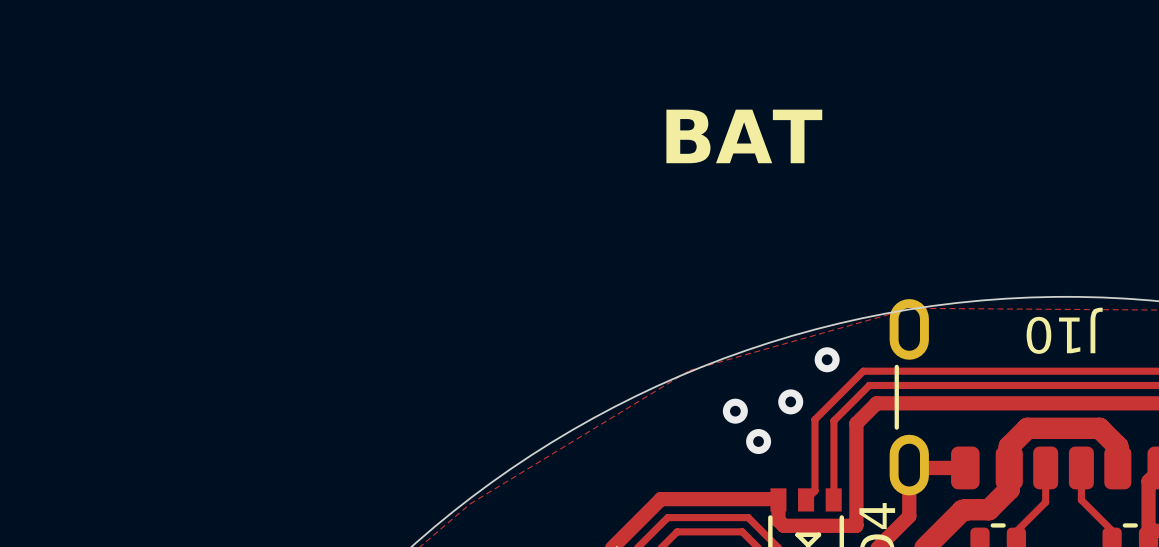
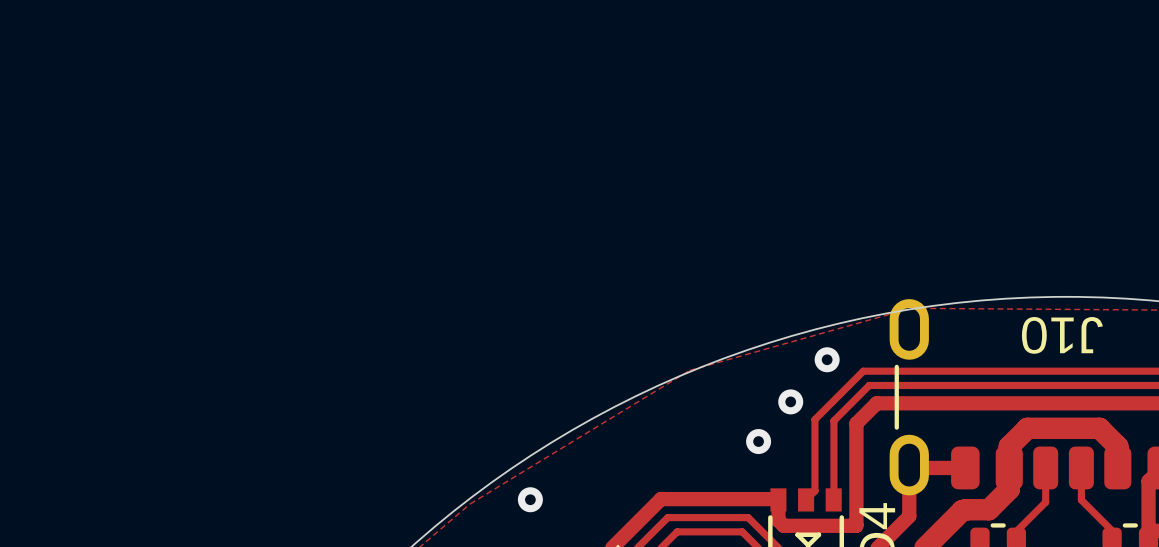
text: BAT (744, 136) -> none
via: (735, 411) -> none
via: none -> (530, 499)

